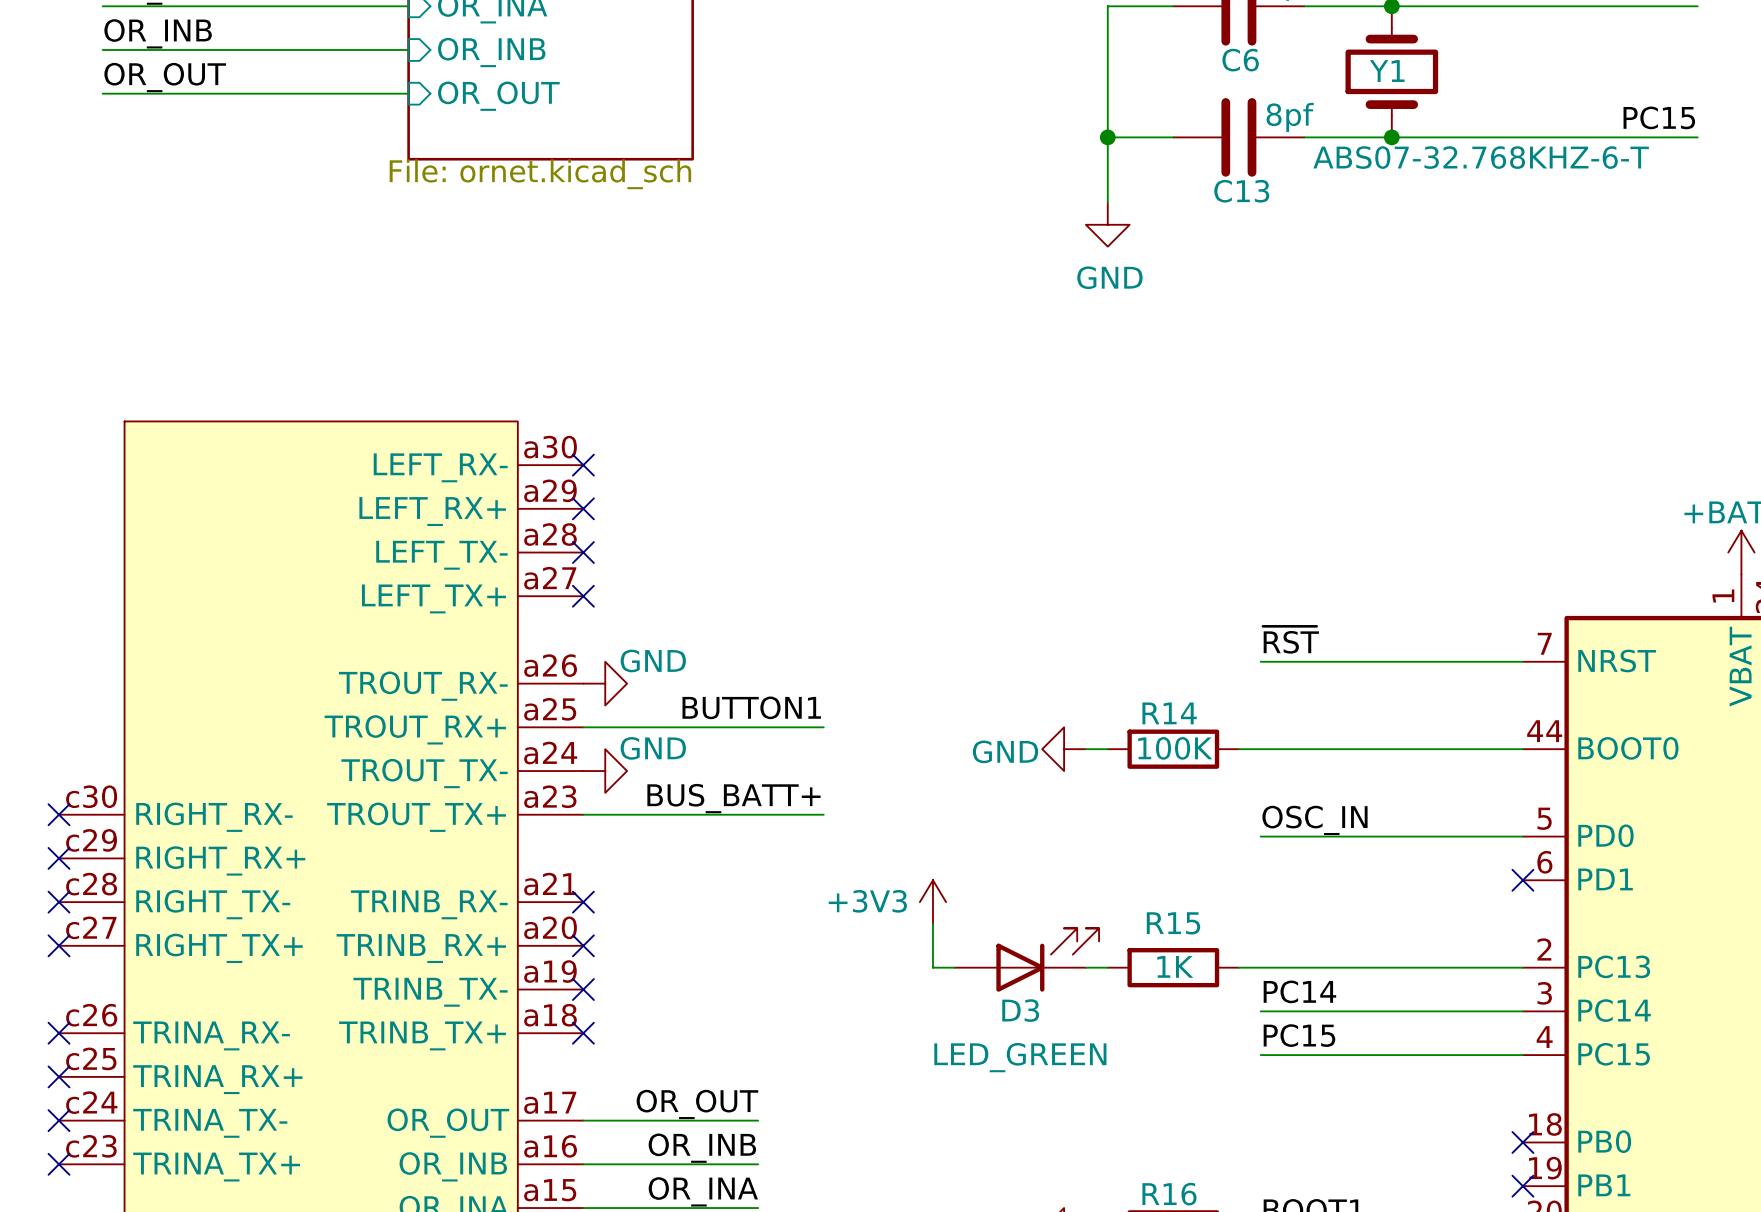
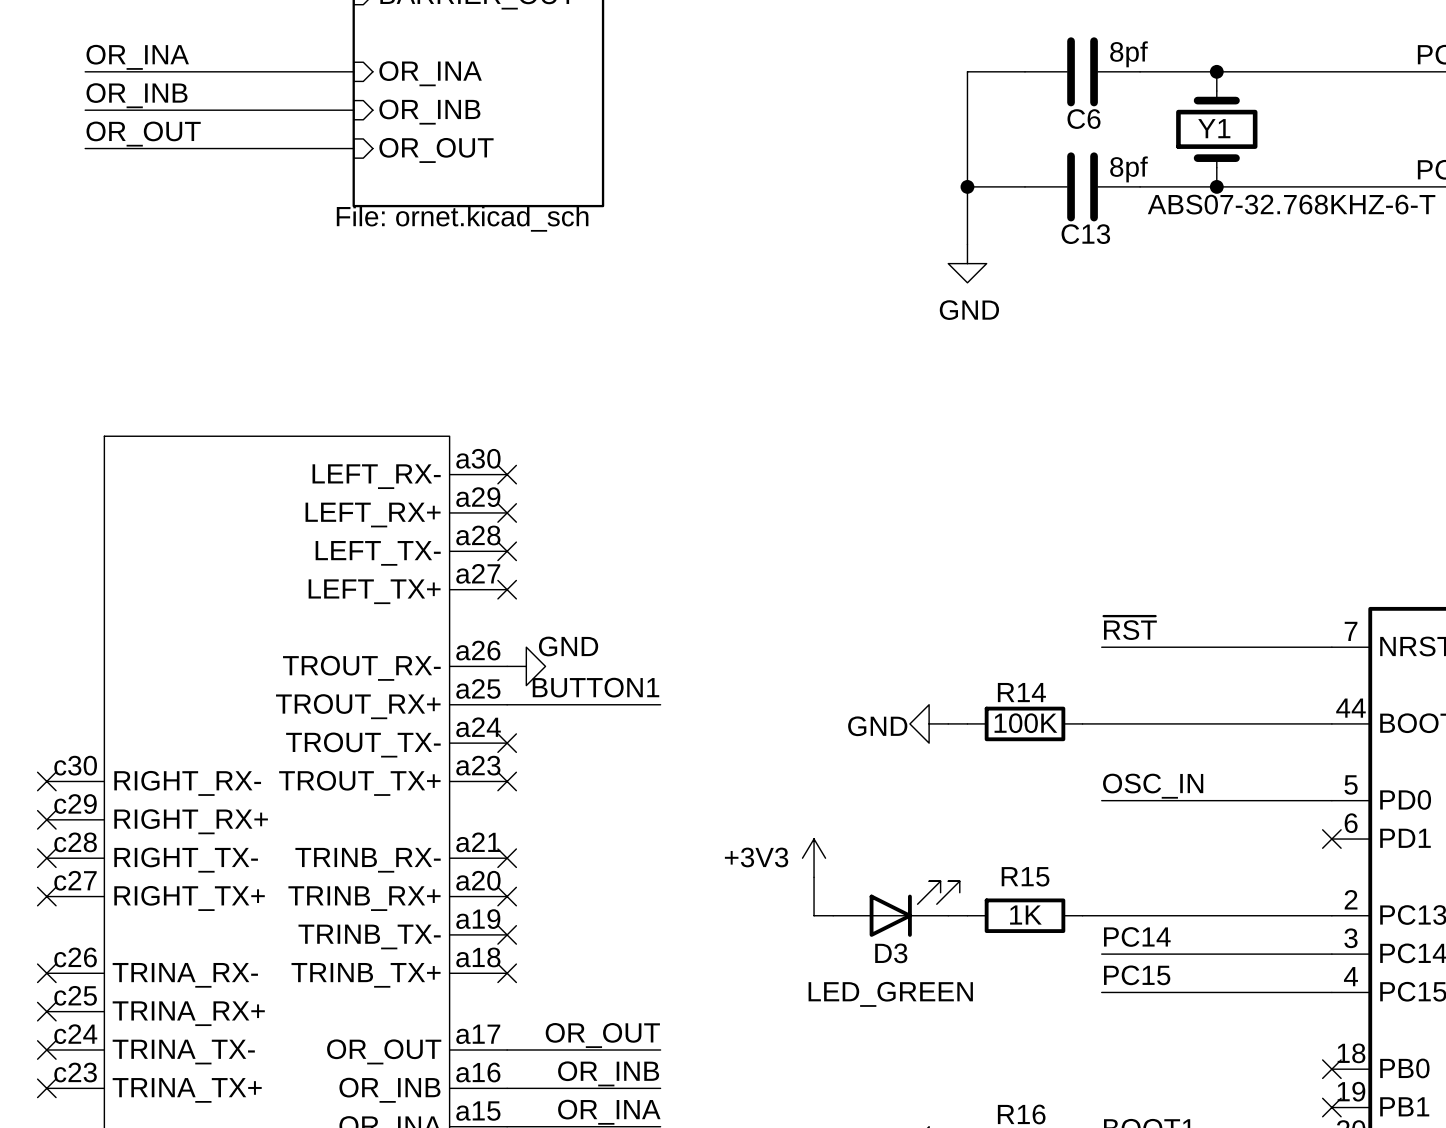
label position: BUTTON1 (751, 707) -> BUTTON1 (595, 687)
wire: (758, 727) (823, 727) -> none
no-connect mark: none -> (507, 743)
power symbol: GND (605, 771) -> none
label: BUS_BATT+ (733, 798) -> none
wire: (583, 814) (823, 814) -> none
no-connect mark: none -> (507, 781)

